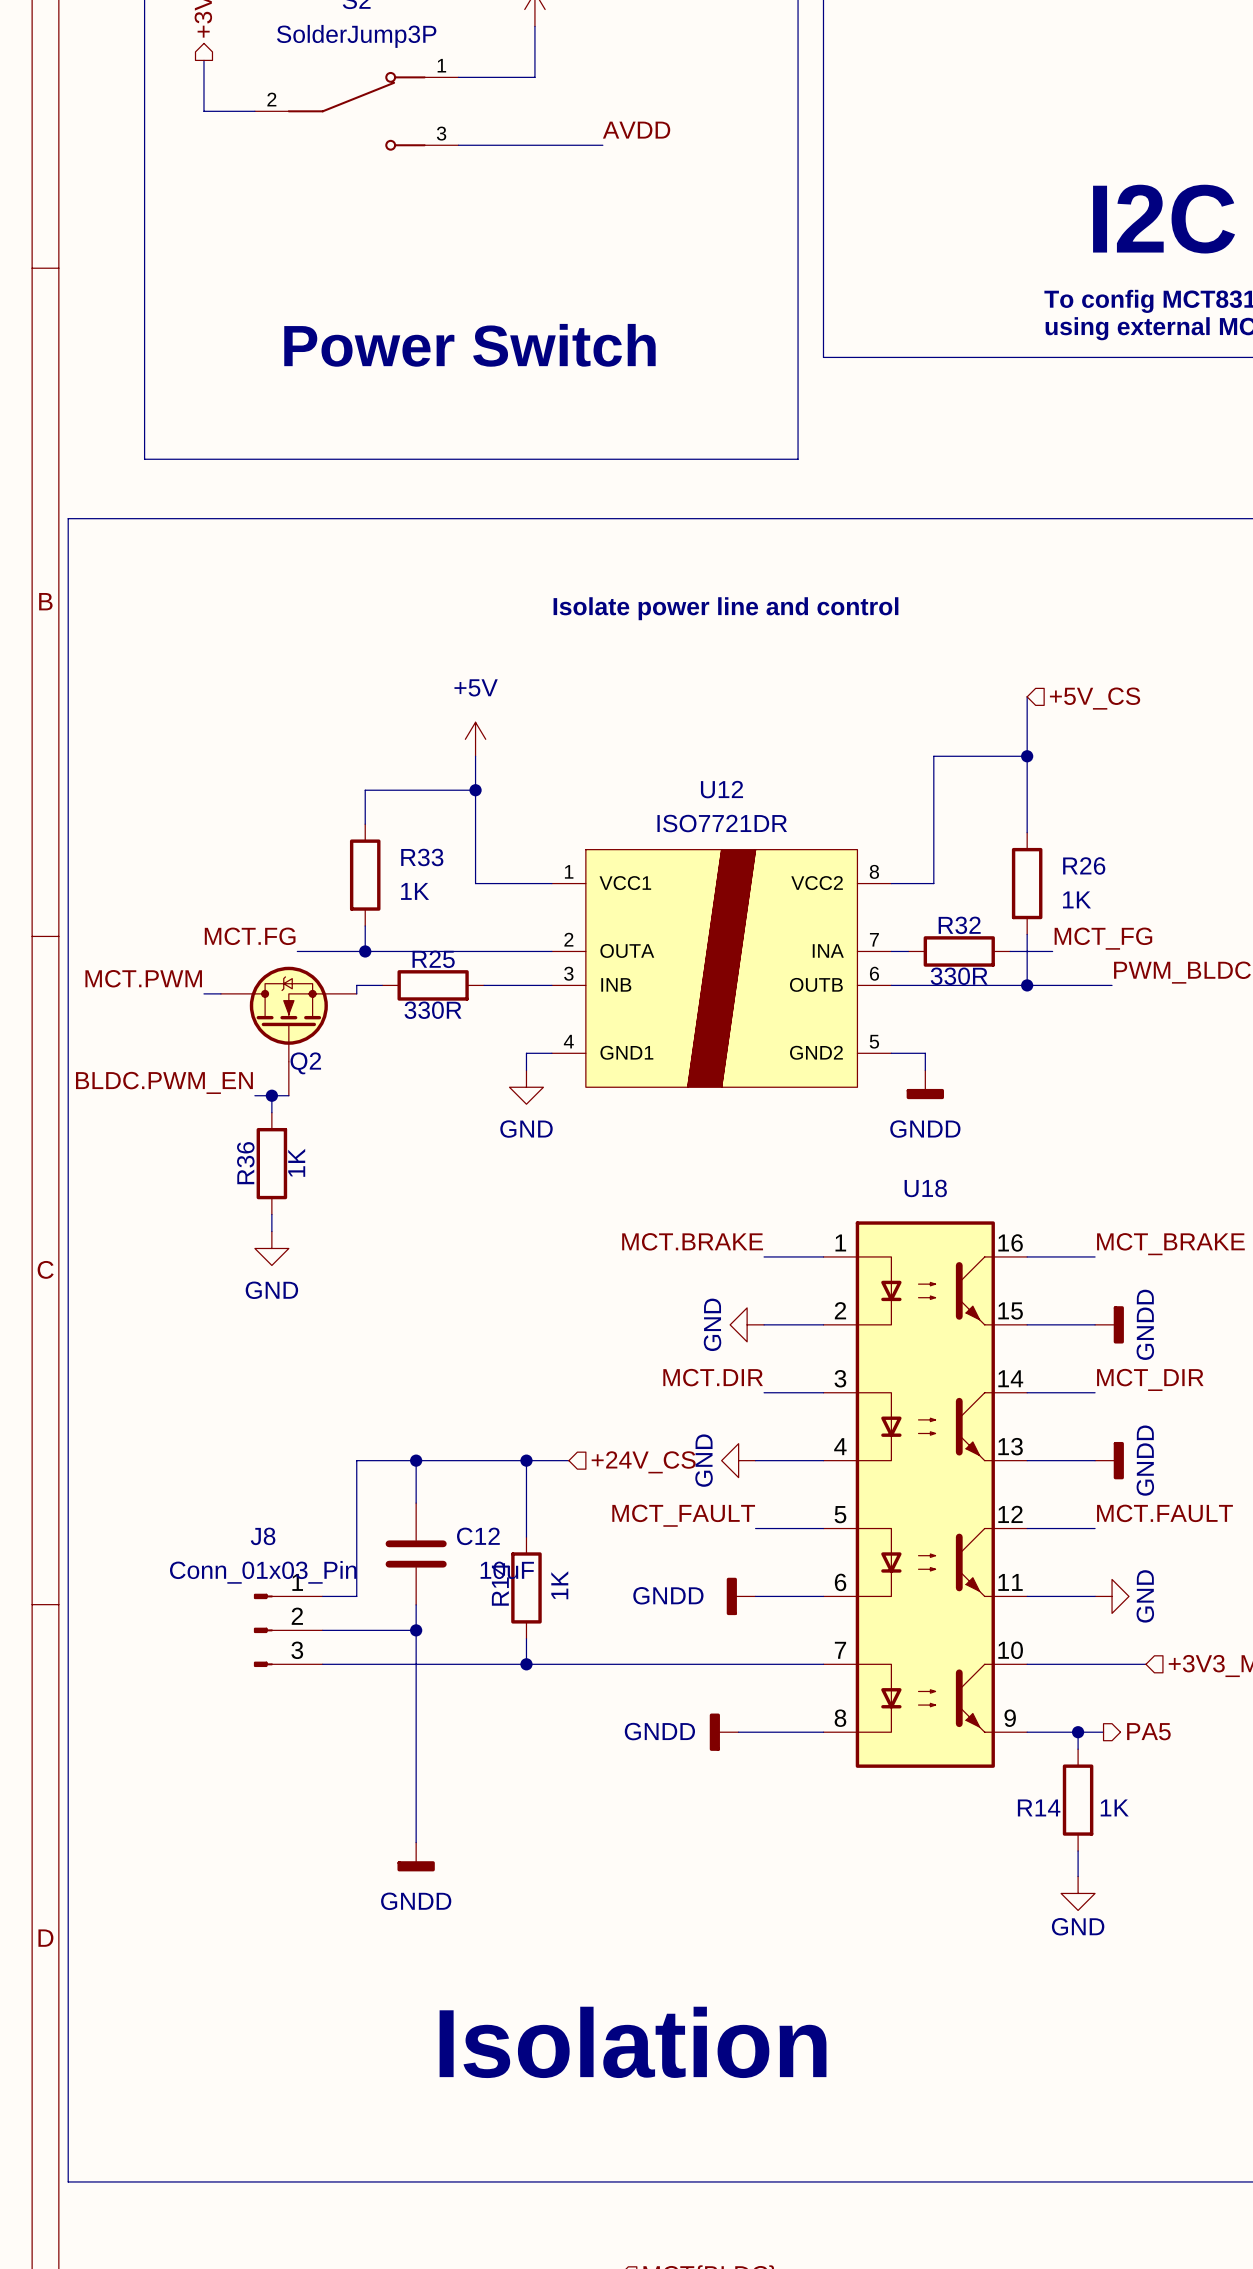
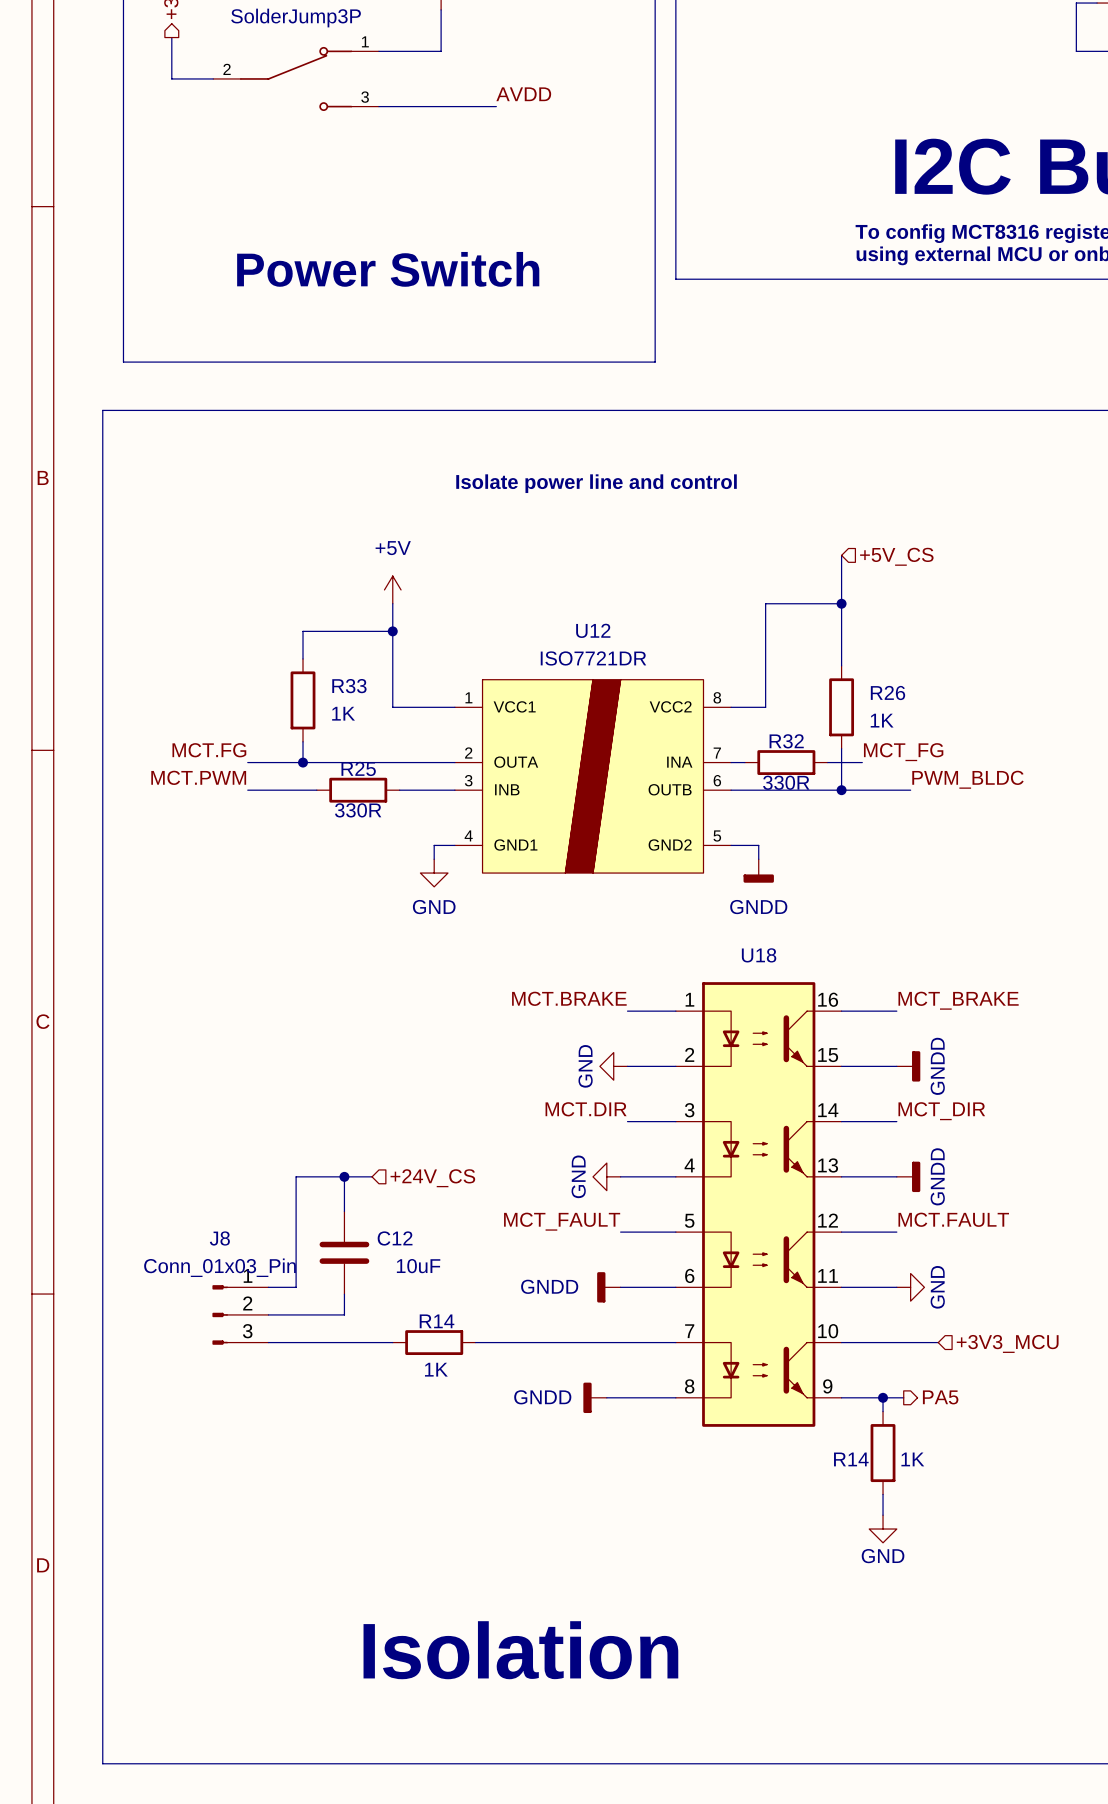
line: (119, 518) (68, 518) (68, 2181) (119, 2181) -> (102, 410) (102, 1763)
label position: MCT.PWM (143, 978) -> MCT.PWM (198, 777)
wire: (356, 985) (356, 993) -> (296, 790) (247, 790)
wire: (203, 993) (220, 993) -> none
Q2: (288, 1031) -> none
label: BLDC.PWM_EN (164, 1082) -> none
wire: (254, 1095) (288, 1095) -> none
wire: (271, 1095) (271, 1112) -> none
junction: (271, 1095) -> none
R36: 1K (271, 1163) -> none
wire: (271, 1214) (271, 1231) -> none
power symbol: GND (271, 1248) -> none
wire: (450, 1460) (568, 1460) -> none
wire: (526, 1460) (526, 1537) -> none
junction: (526, 1460) -> none
hierarchical label position: +24V_CS (643, 1462) -> +24V_CS (432, 1178)
R14 rotation: 0° (526, 1587) -> 90° clockwise (434, 1342)
R14 position: (526, 1587) -> (434, 1342)
wire: (416, 1630) (416, 1842) -> none
junction: (416, 1630) -> none
wire: (526, 1638) (526, 1664) -> none
wire: (475, 1664) (577, 1664) -> none
junction: (526, 1664) -> none
power symbol: GNDD (416, 1856) -> none

